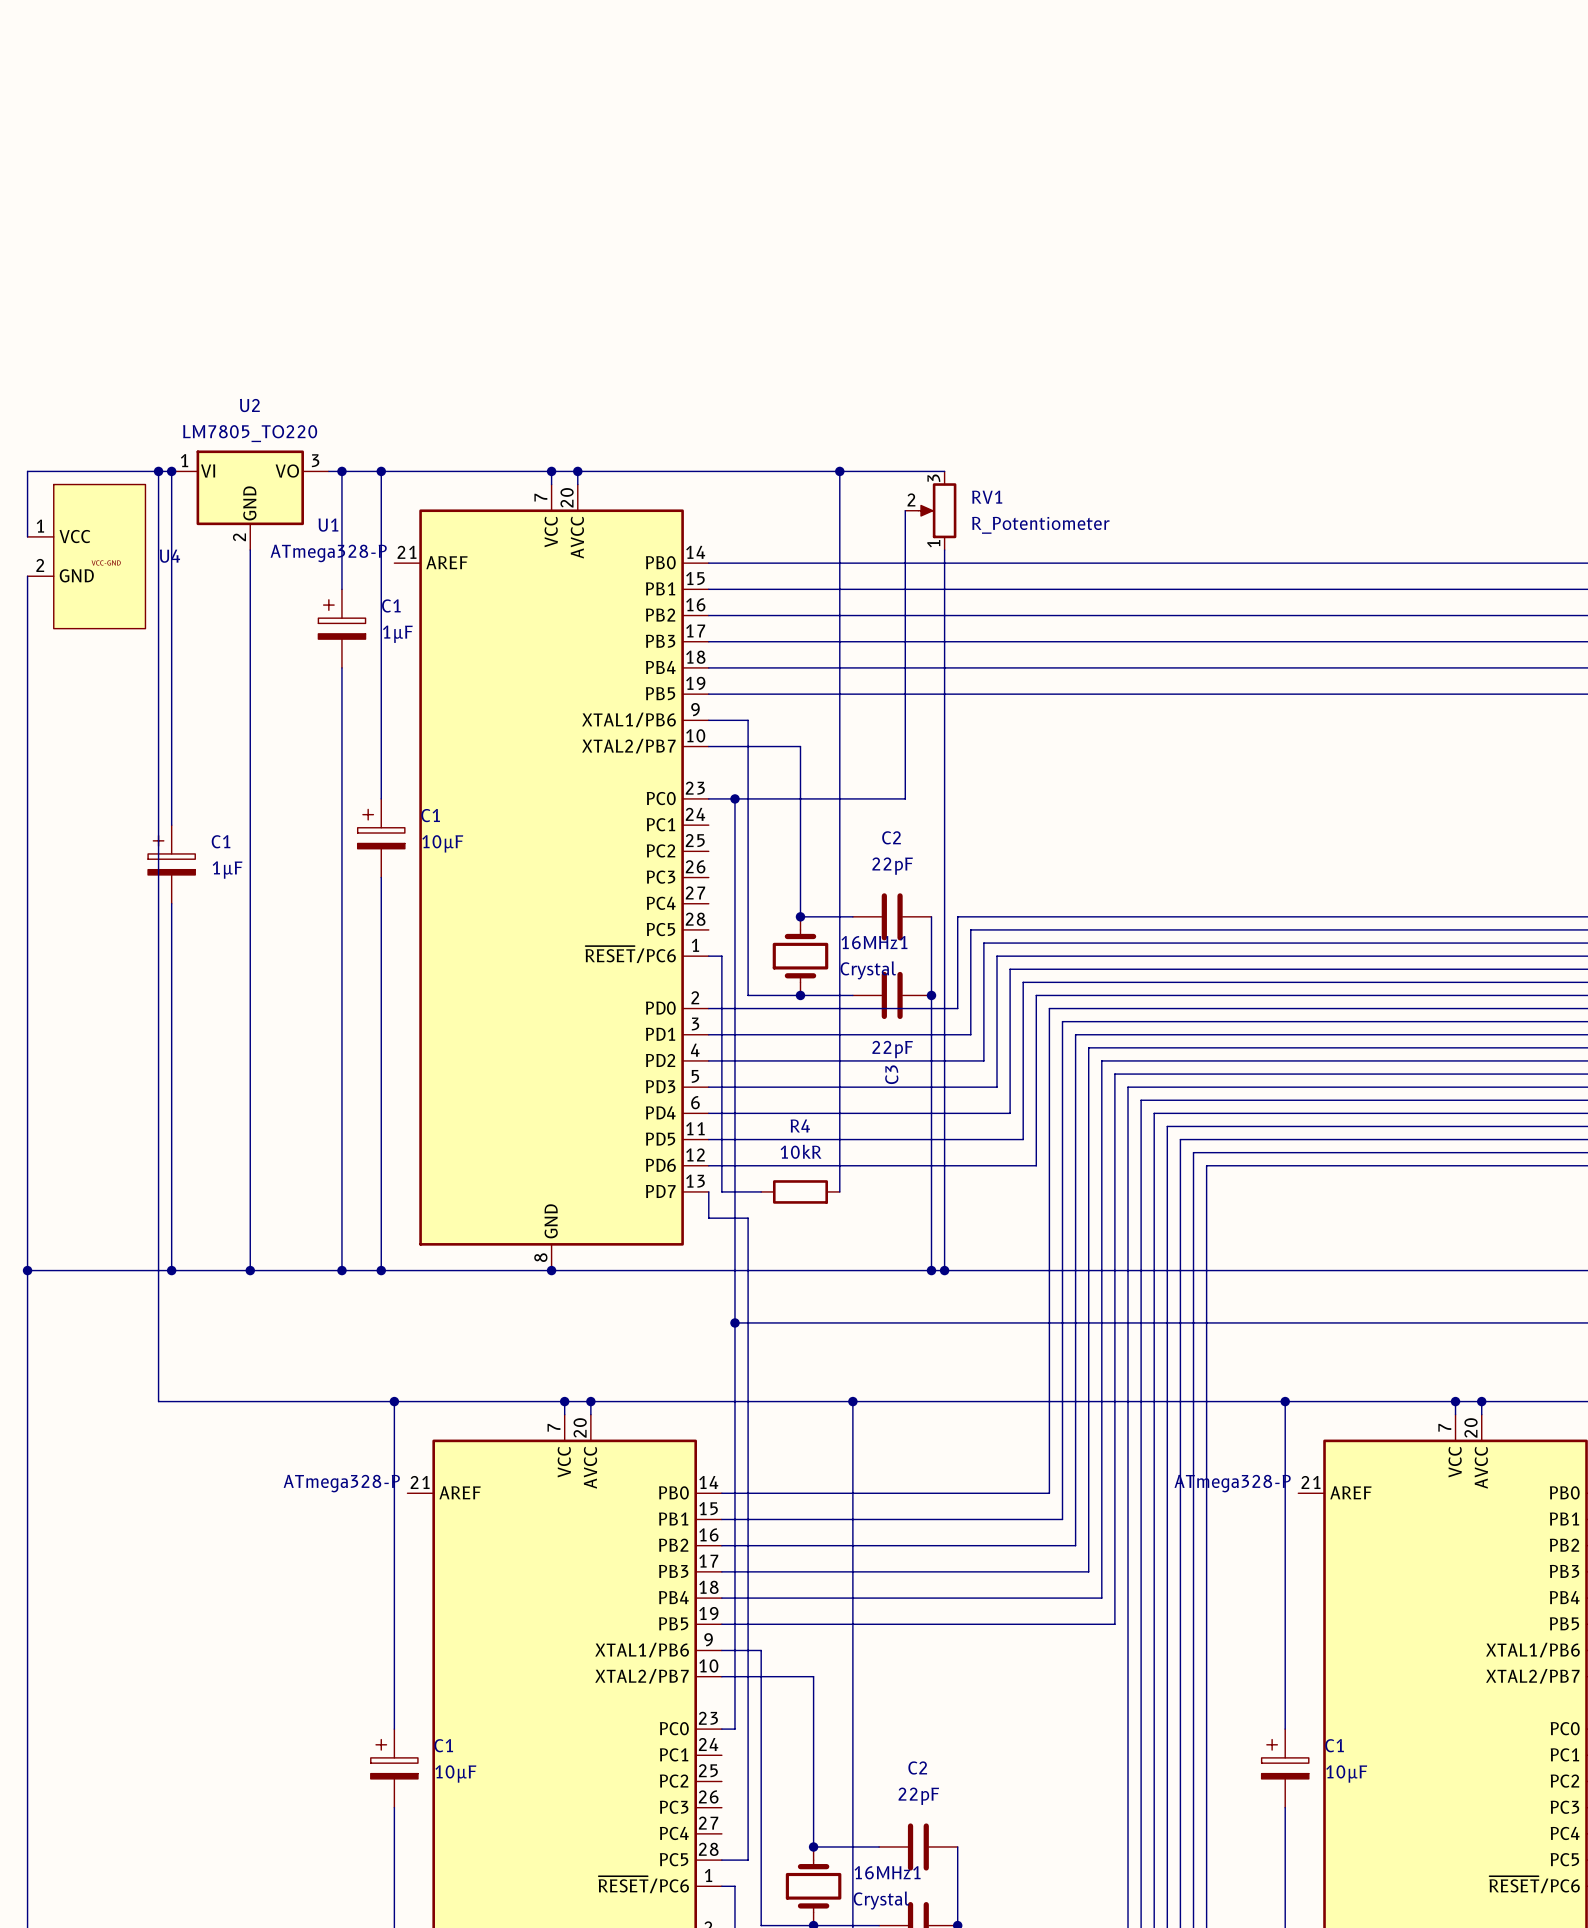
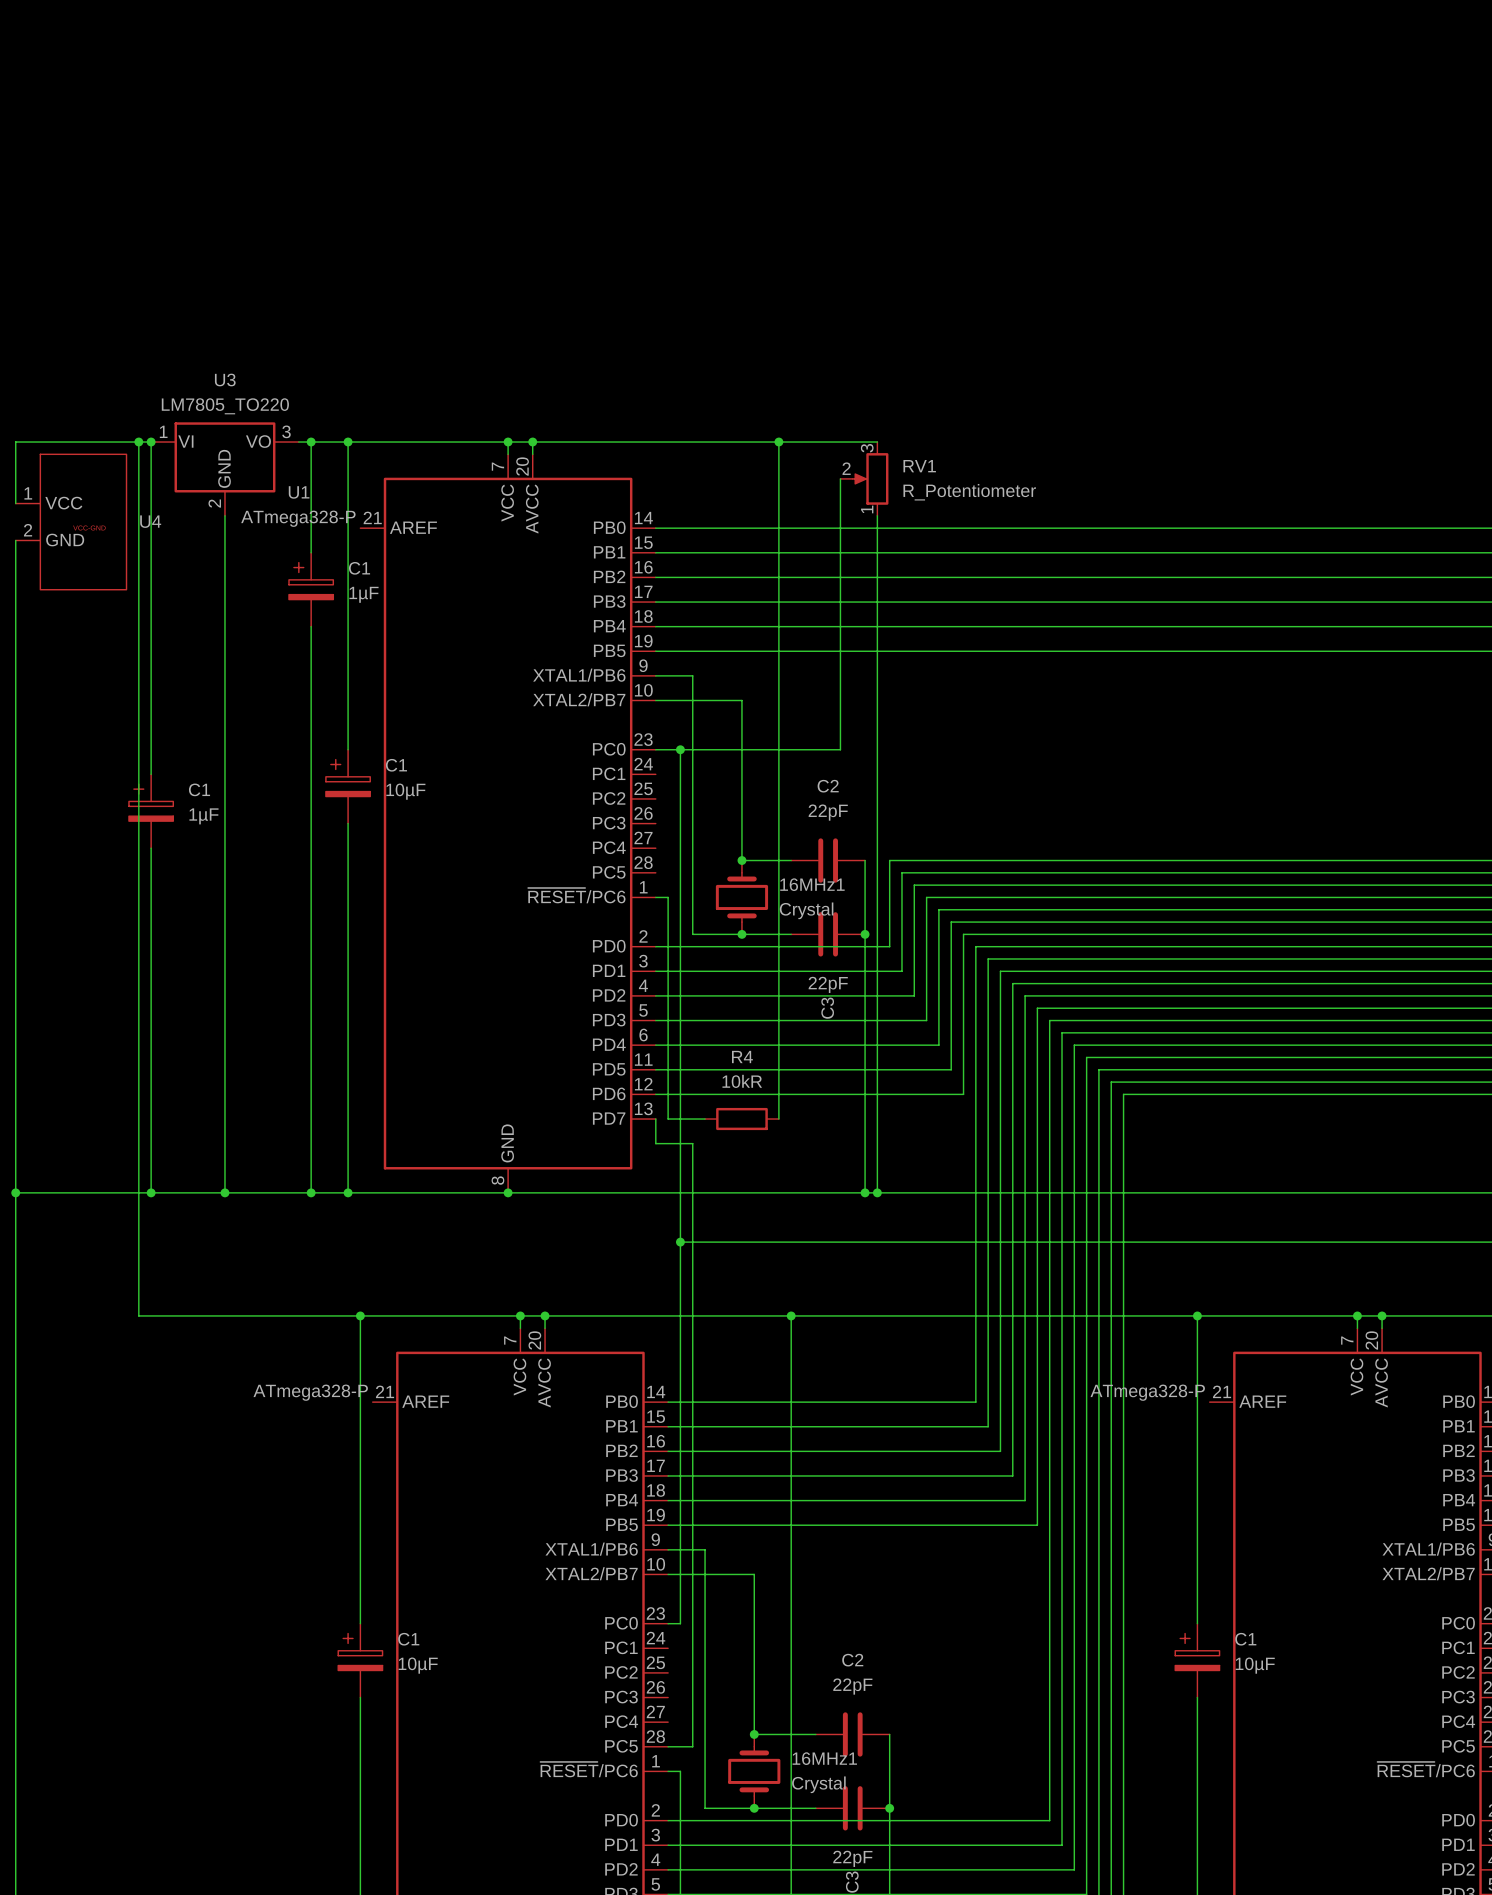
U2 name: U2 (249, 405) -> U3 (225, 380)

